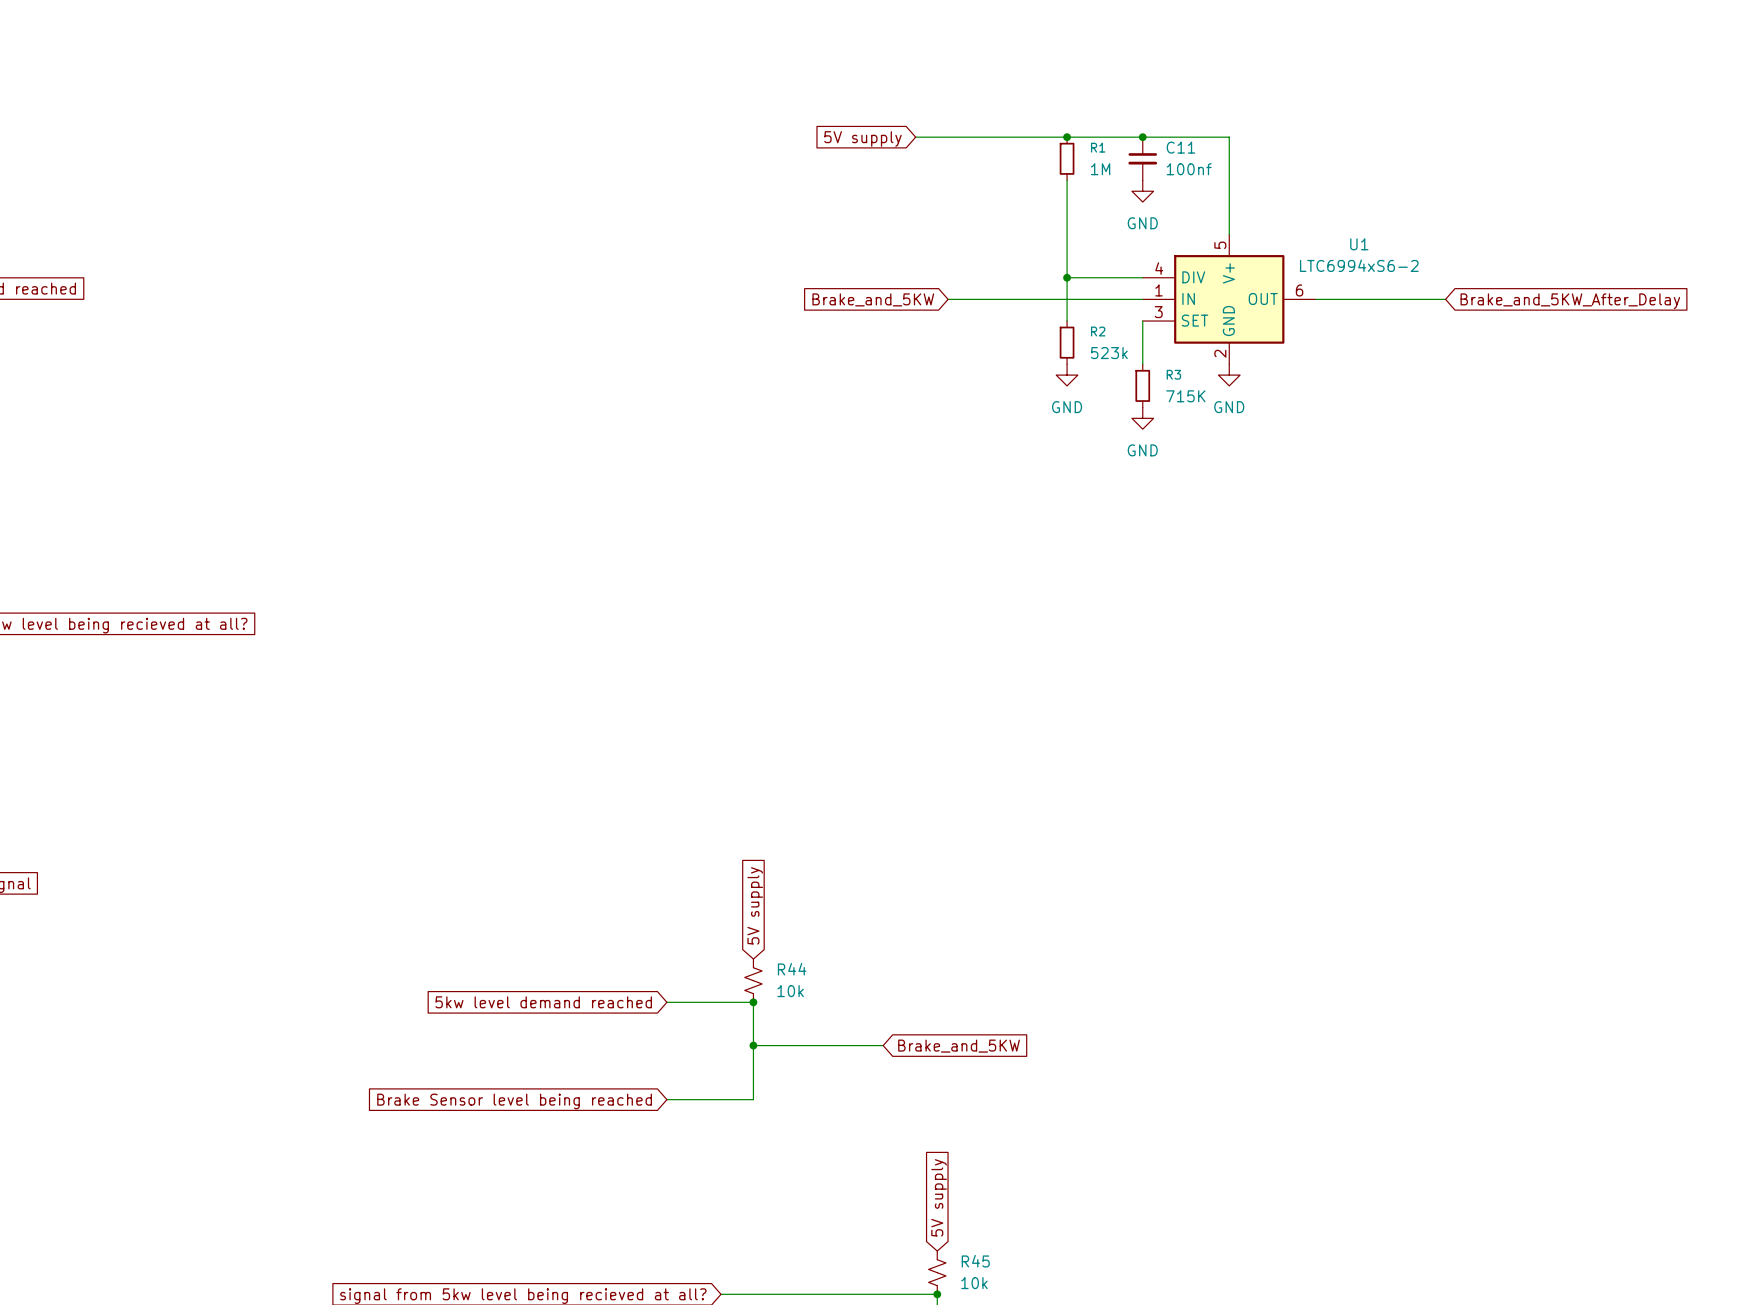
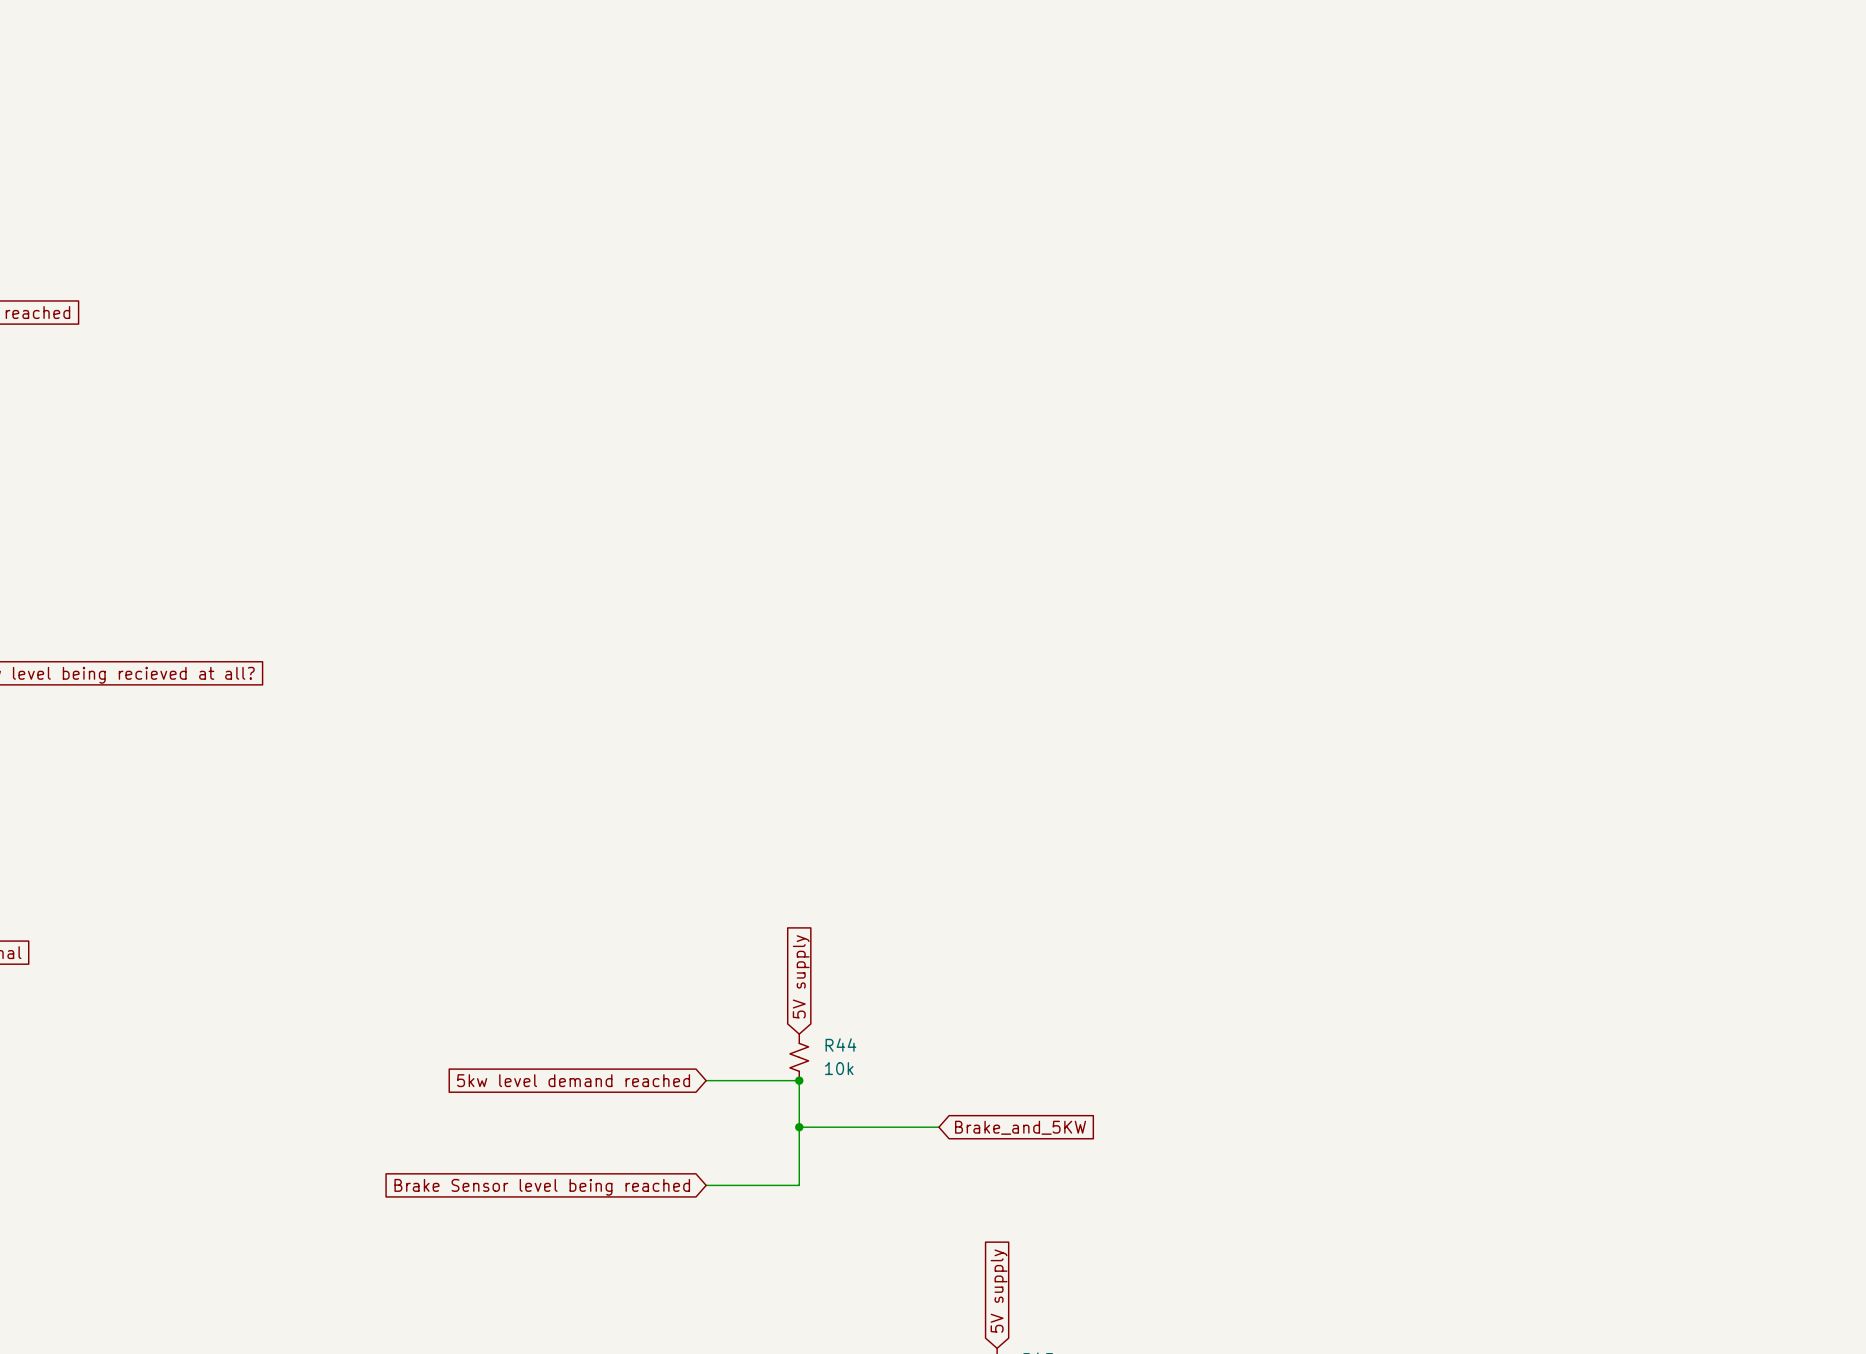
wire: (915, 137) (1229, 137) (1229, 234) -> none
junction: (1067, 137) -> none
junction: (1142, 137) -> none
global label: 5V supply (862, 138) -> none
R1: 1M (1067, 158) -> none
C11: 100nf (1142, 158) -> none
wire: (1067, 180) (1067, 321) -> none
power symbol: GND (1142, 191) -> none
wire: (1067, 277) (1142, 277) -> none
junction: (1067, 277) -> none
global label: Brake_and_5KW (873, 299) -> none
wire: (948, 299) (1142, 299) -> none
U1: LTC6994xS6-2 (1229, 299) -> none
wire: (1315, 299) (1445, 299) -> none
global label: Brake_and_5KW_After_Delay (1570, 301) -> none
wire: (1142, 321) (1142, 364) -> none
R2: 523k (1067, 342) -> none
power symbol: GND (1067, 375) -> none
power symbol: GND (1229, 375) -> none
R3: 715K (1142, 385) -> none
power symbol: GND (1142, 418) -> none

